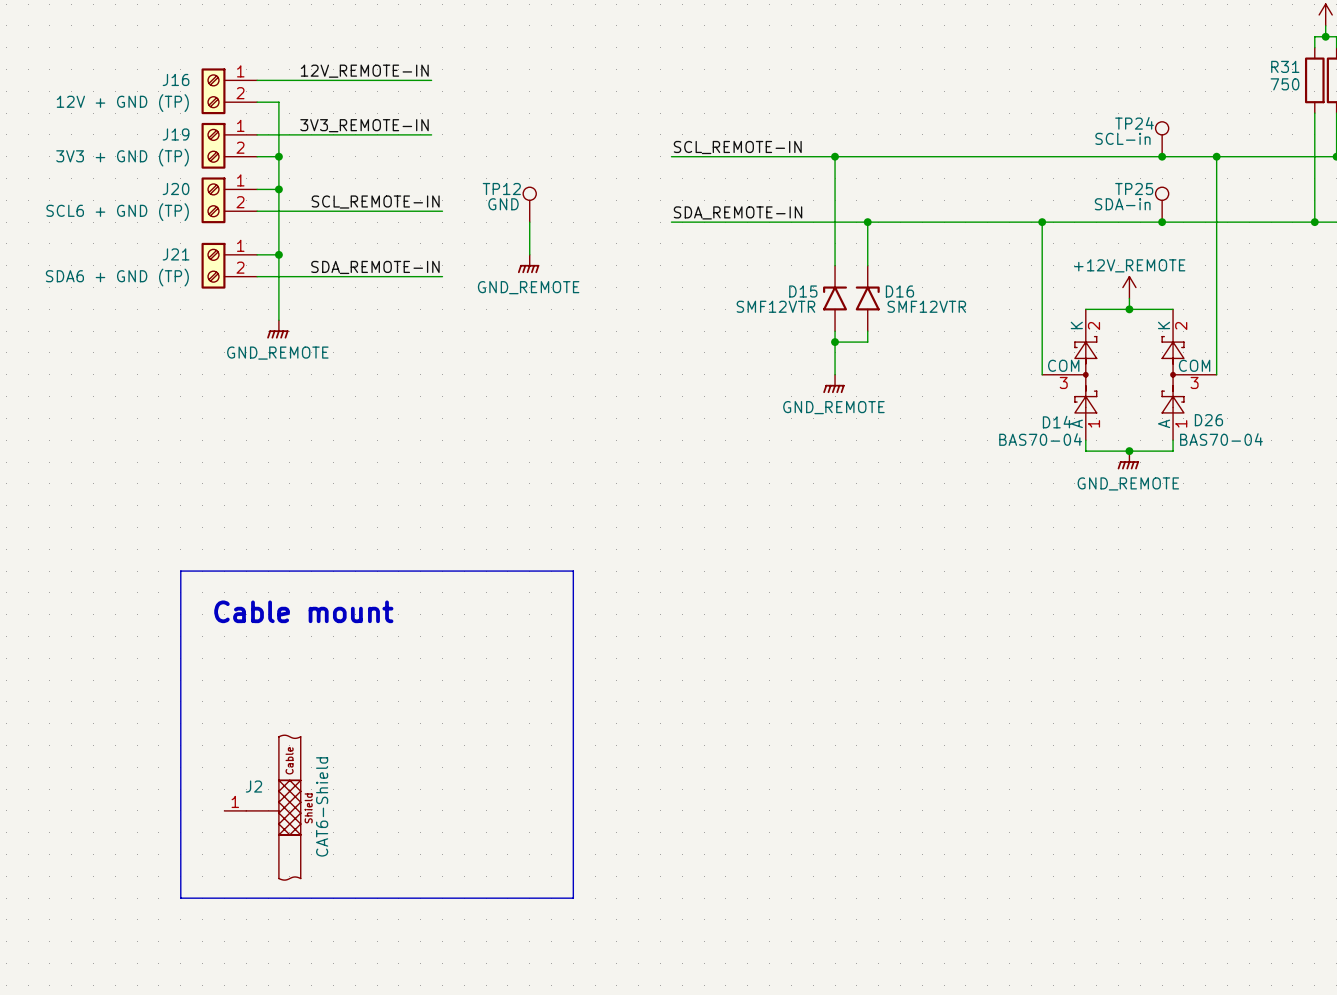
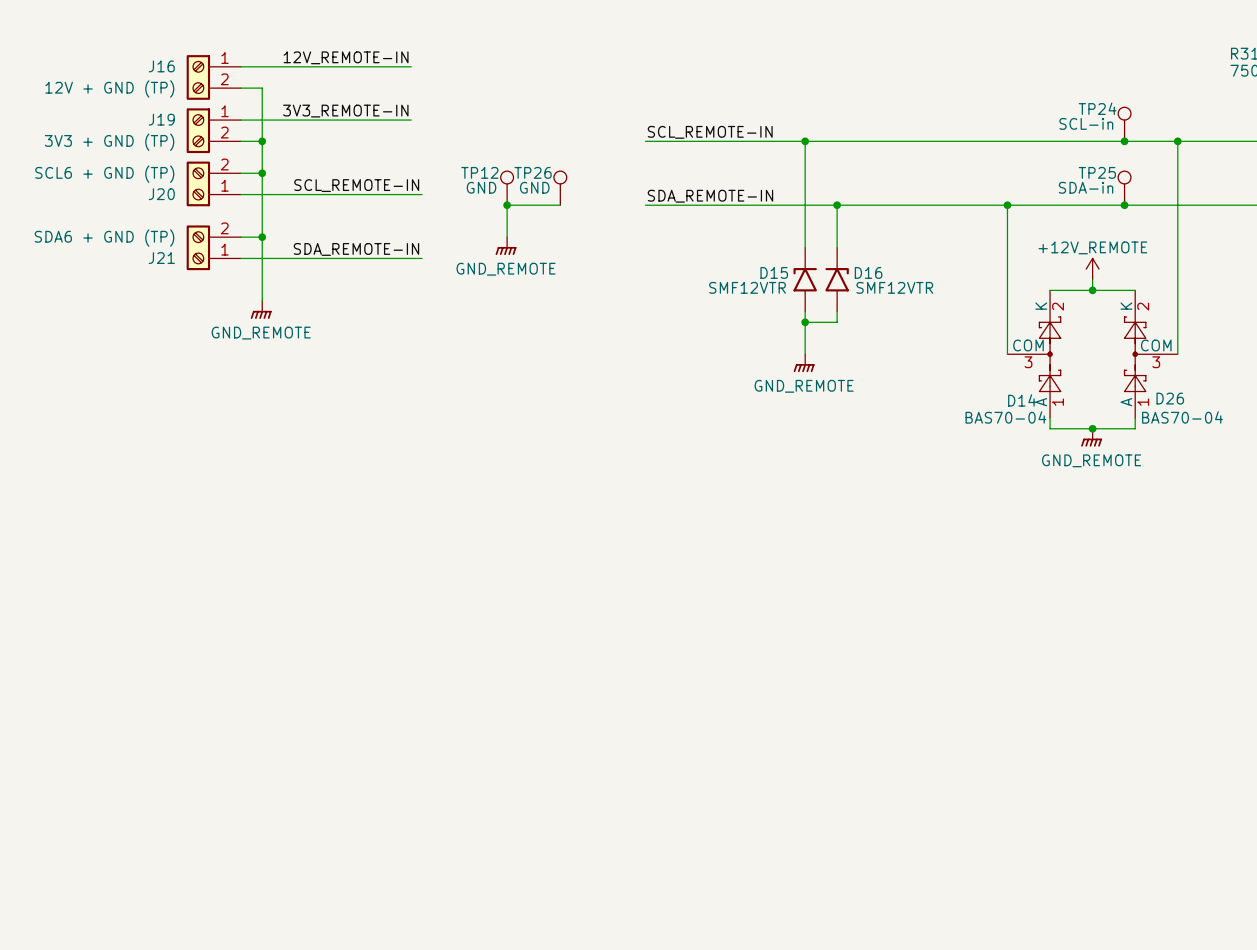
J20 flip: as is (213, 200) -> up-down (198, 183)
TP26: none -> GND (560, 188)
wire: none -> (507, 205) (560, 205)
junction: none -> (507, 205)
J21 flip: as is (213, 265) -> up-down (198, 247)
line: (180, 571) (573, 571) (573, 898) (180, 898) (180, 571) -> none
text: Cable mount (303, 611) -> none
J2: CAT6-Shield (262, 807) -> none

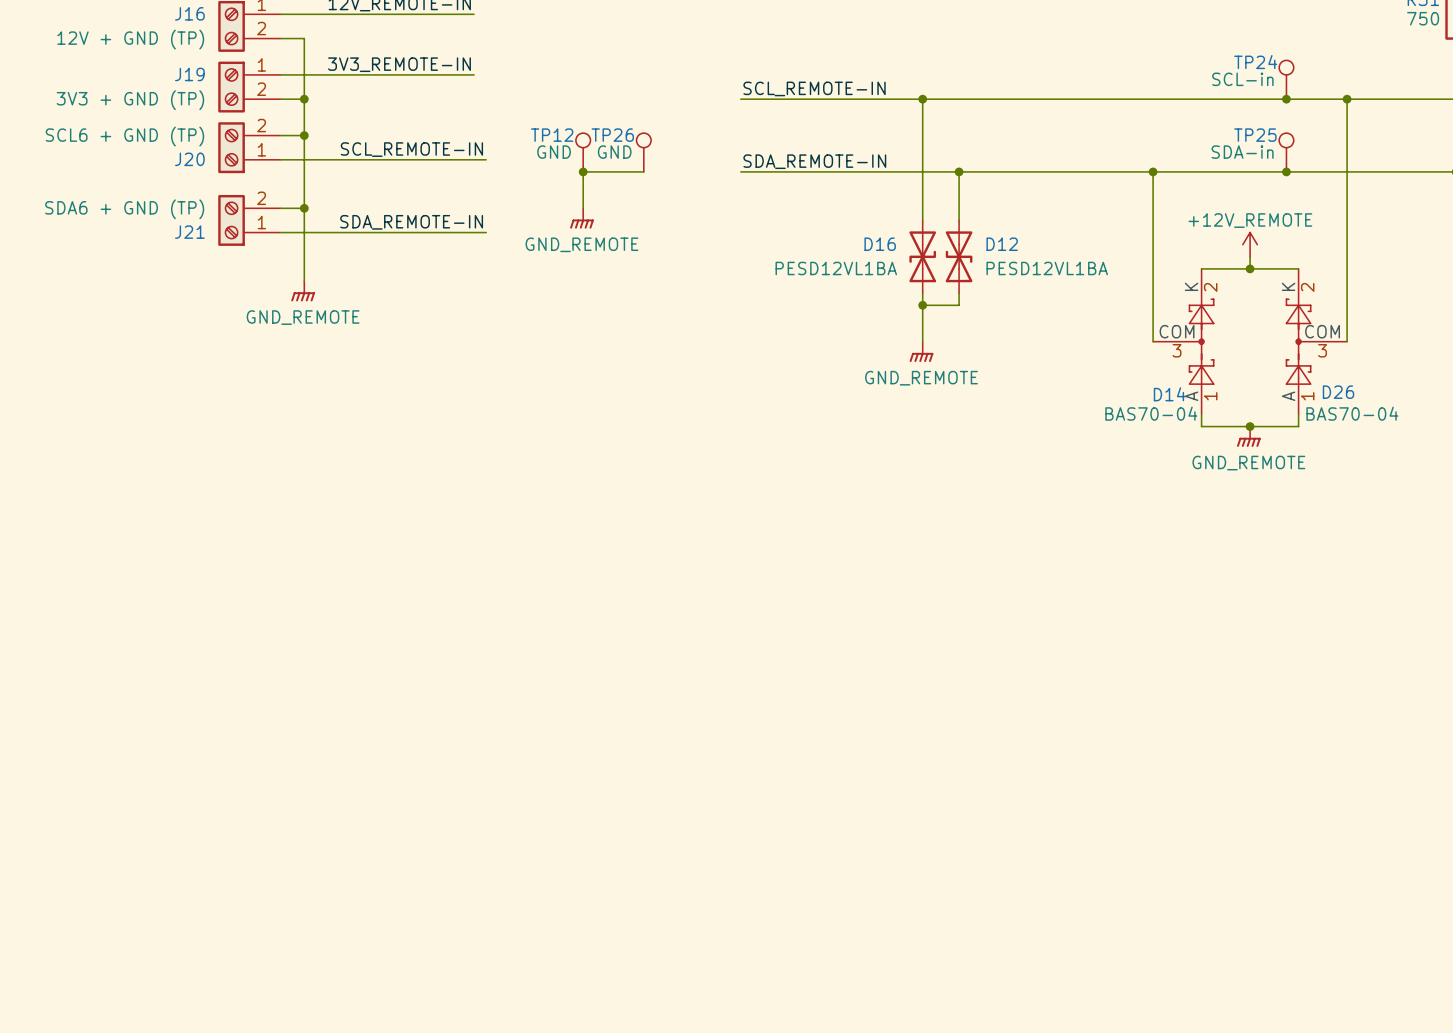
D16 symbol: [825, 247, 849, 312] -> [909, 220, 937, 294]
D16 name position: D16 (868, 272) -> D16 (880, 244)
D15: SMF12VTR (805, 279) -> none
D12: none -> PESD12VL1BA (959, 256)
D16 value: SMF12VTR (894, 287) -> PESD12VL1BA (836, 268)

